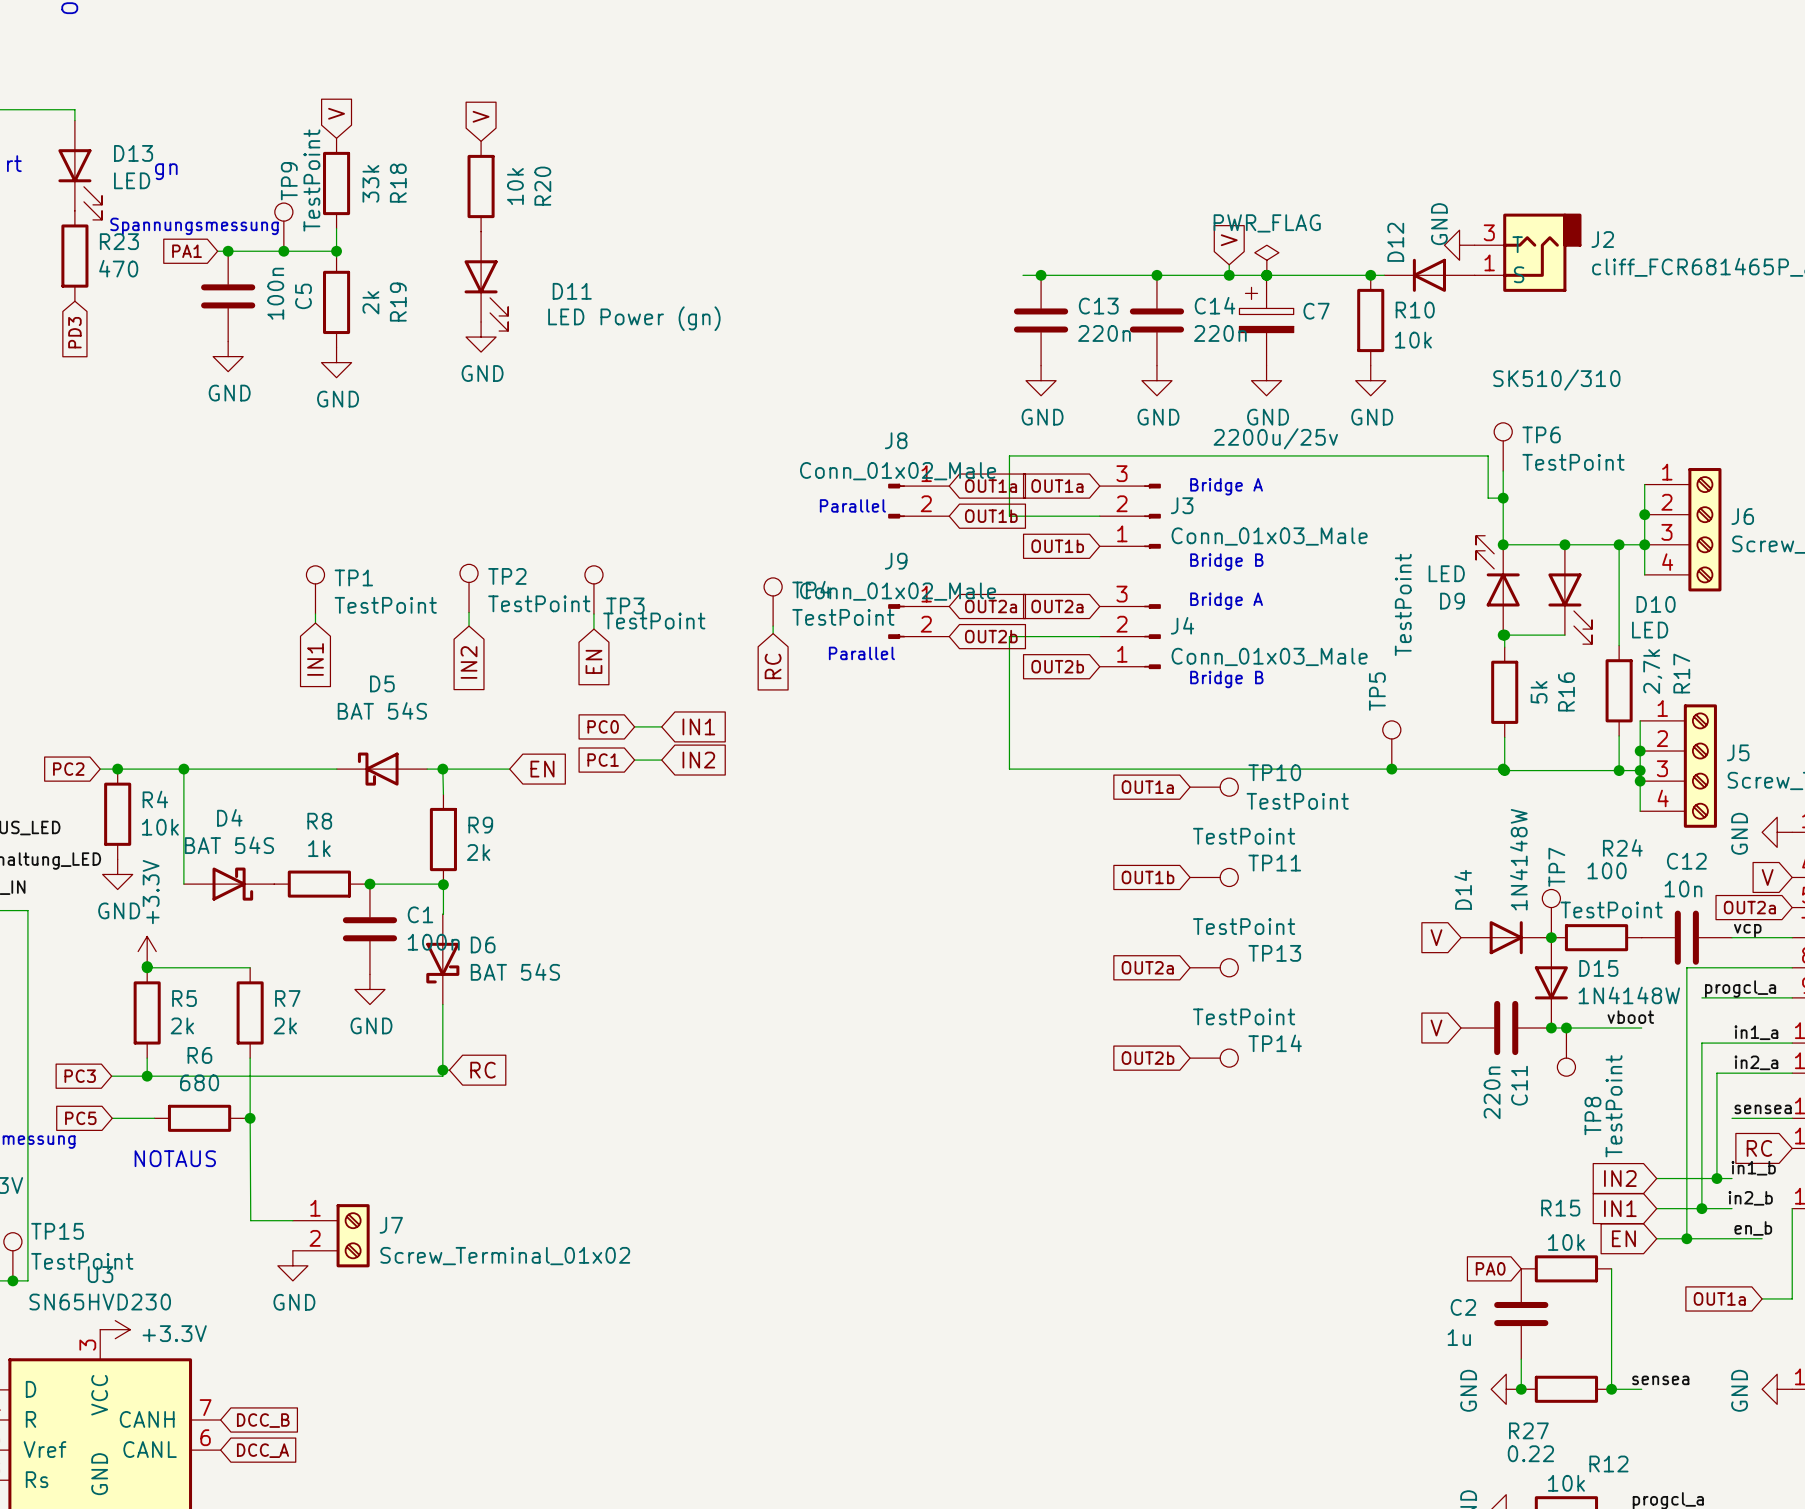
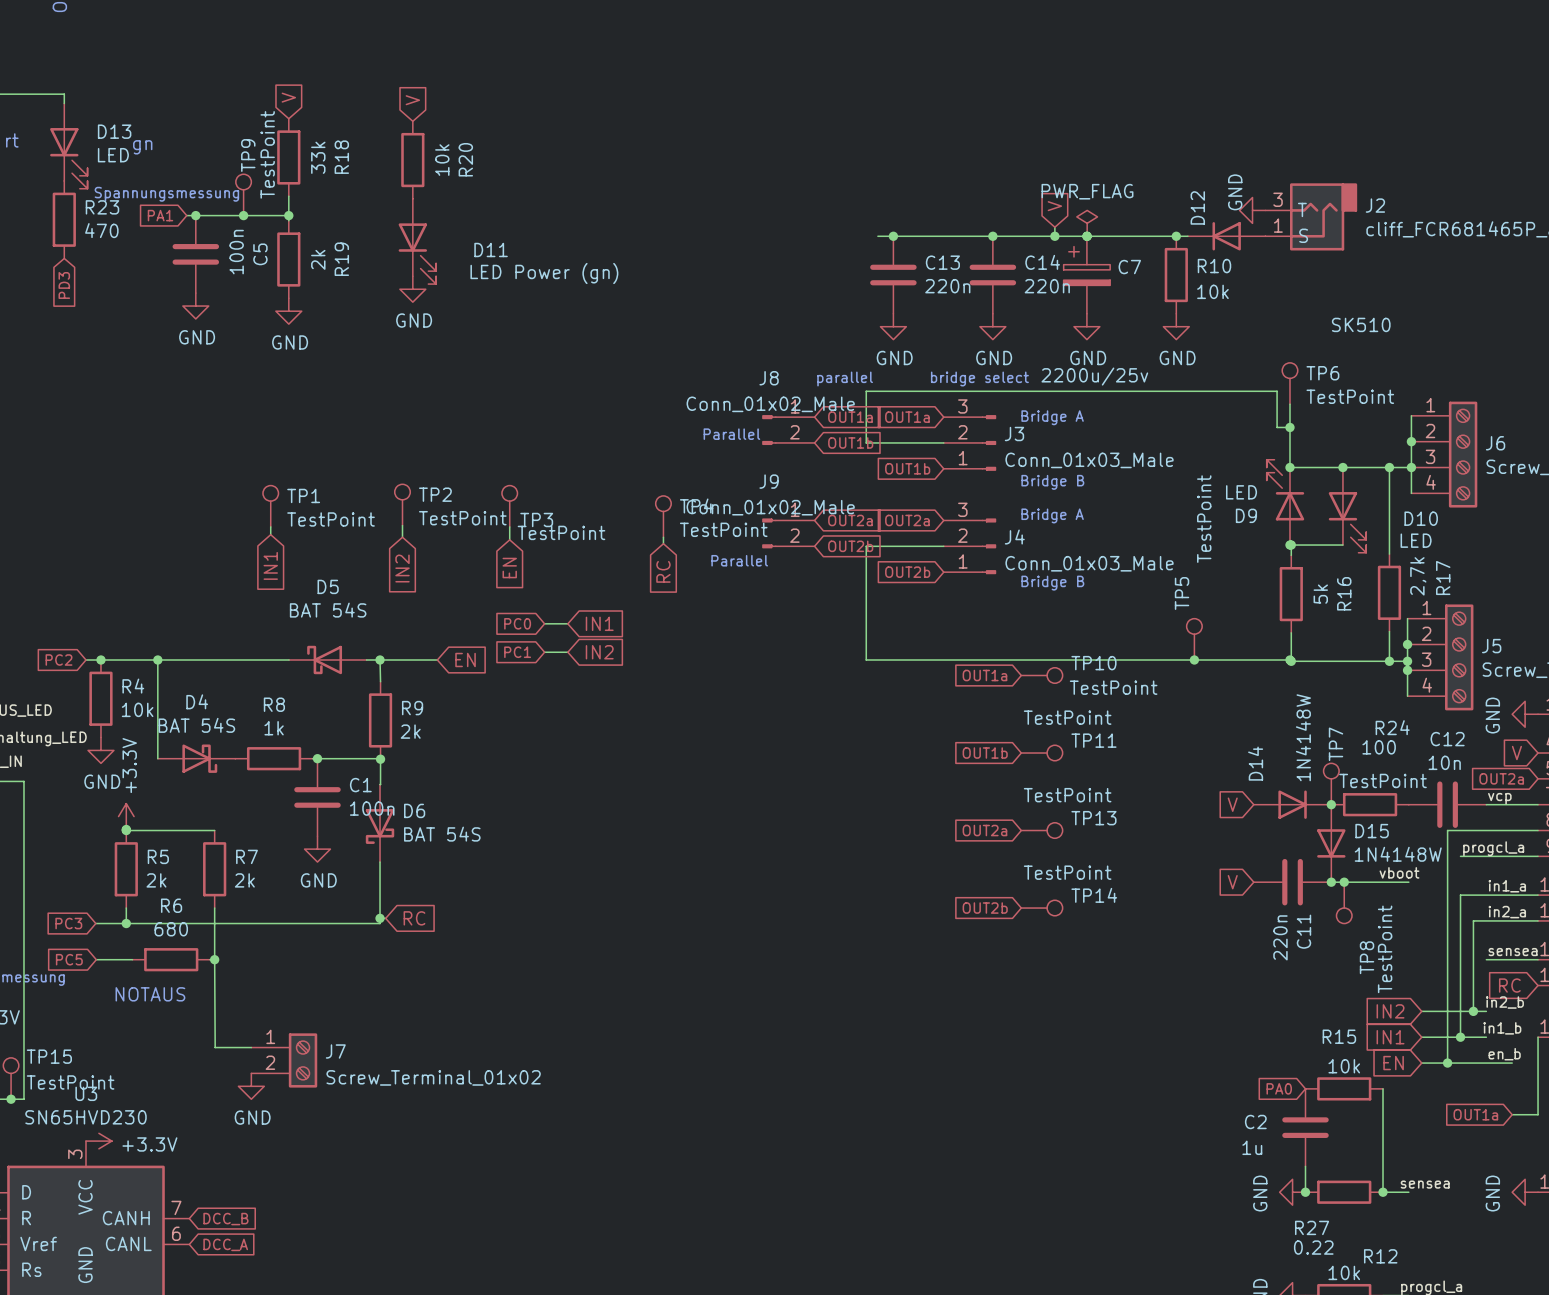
D12 value: SK510/310 (1556, 380) -> SK510 (1361, 324)
text: none -> parallel (845, 378)
text: none -> bridge select (979, 378)
label: in1_b (1753, 1168) -> in2_b (1504, 1002)
label: in2_b (1750, 1198) -> in1_b (1502, 1028)

